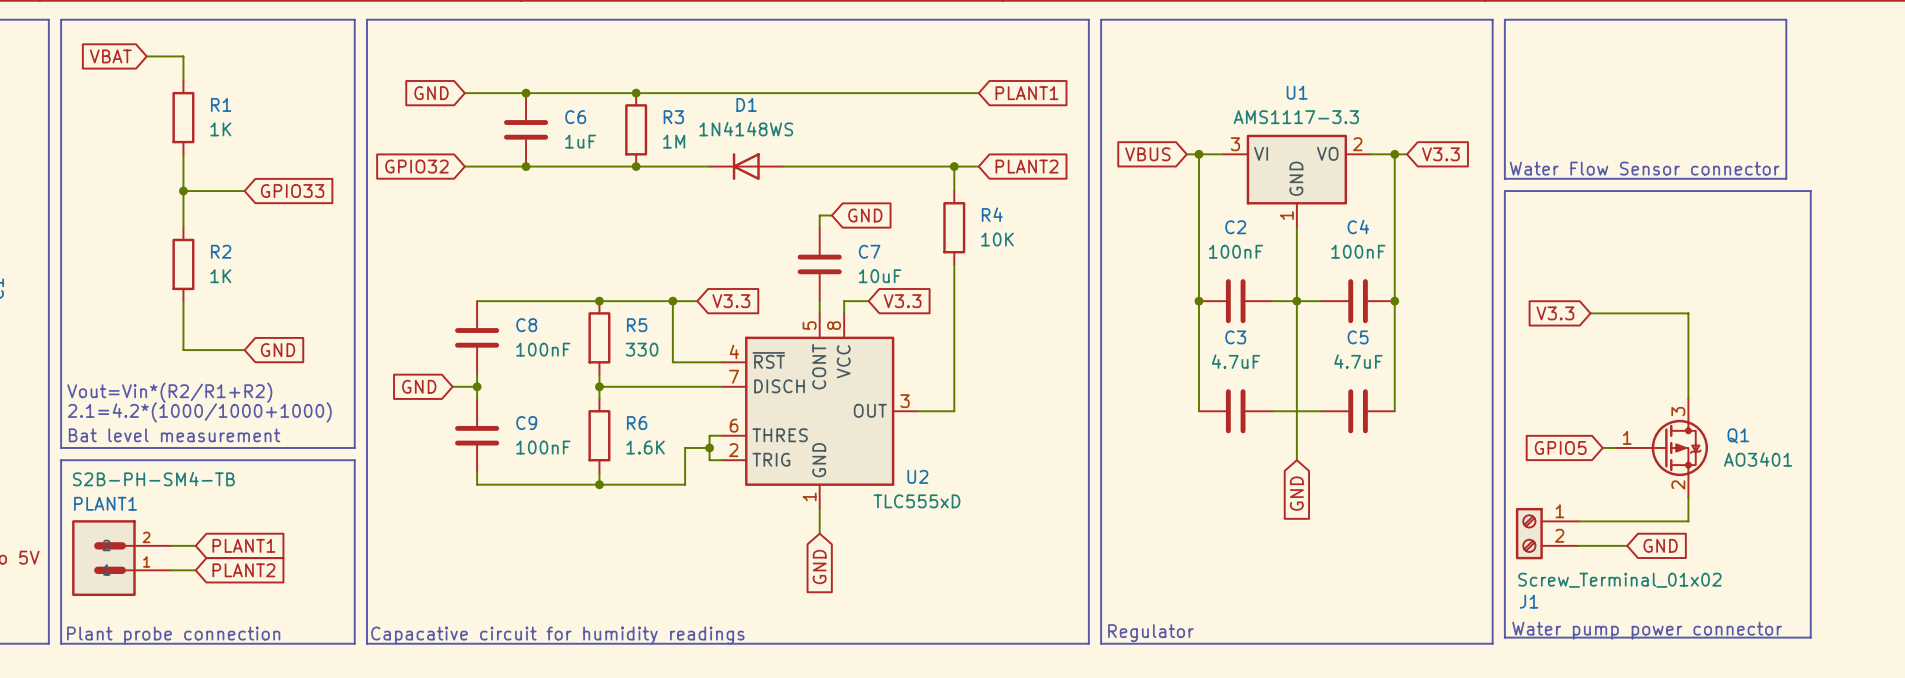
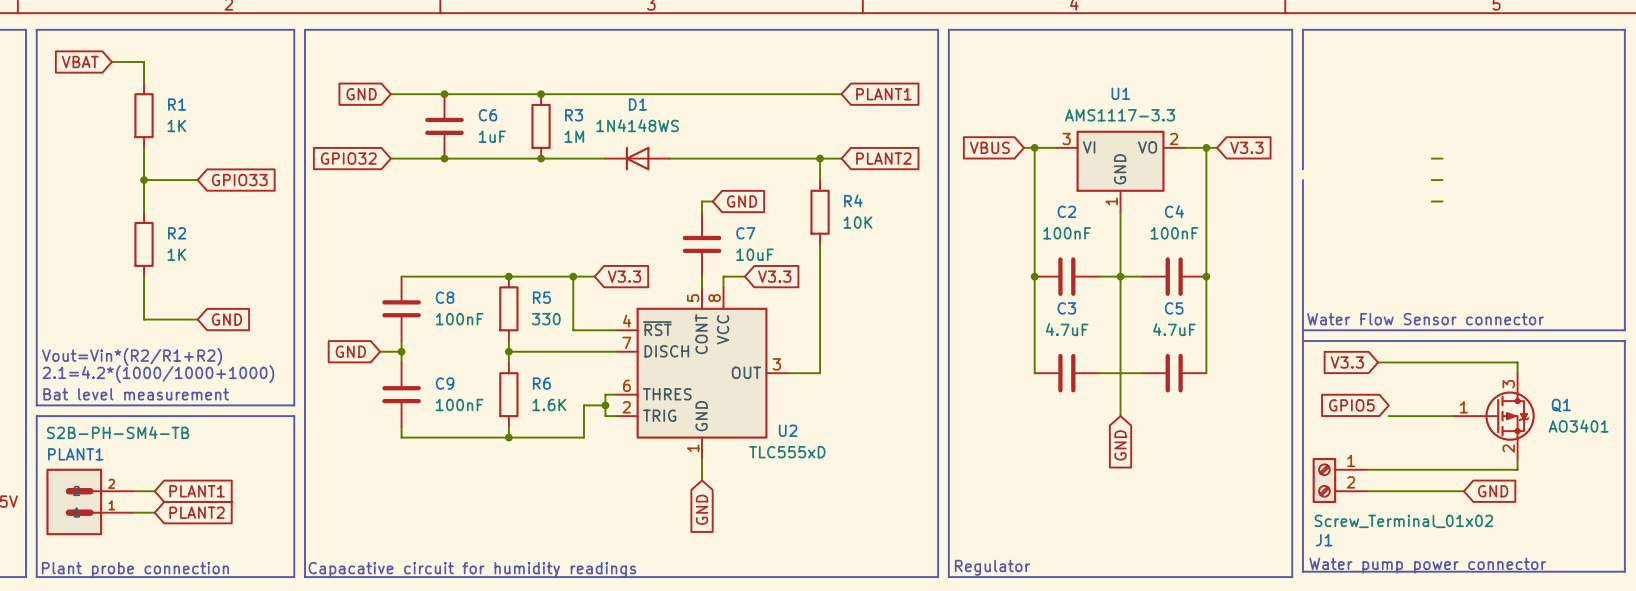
line: (1786, 19) (1786, 178) (1504, 178) -> (1549, 29) (1624, 29) (1624, 330) (1302, 330)
wire: none -> (1431, 158) (1442, 158)
text position: Water Flow Sensor connector (1644, 168) -> Water Flow Sensor connector (1425, 319)
line: (1504, 191) (1810, 191) (1810, 637) -> (1302, 341) (1624, 341) (1624, 571) (1571, 571)
global label position: V3.3 (1555, 313) -> V3.3 (1347, 362)
wire: (1590, 313) (1688, 313) (1688, 399) -> none
wire: none -> (1378, 362) (1517, 362) (1517, 373)
wire: (1602, 447) (1615, 447) -> (1431, 201) (1442, 201)
Q1 position: (1661, 447) -> (1493, 416)
wire: none -> (1388, 416) (1453, 416)
wire: (1688, 496) (1688, 521) -> (1517, 459) (1517, 469) (1463, 469)
wire: none -> (1410, 491) (1463, 491)
global label position: GND (1660, 545) -> GND (1493, 491)

